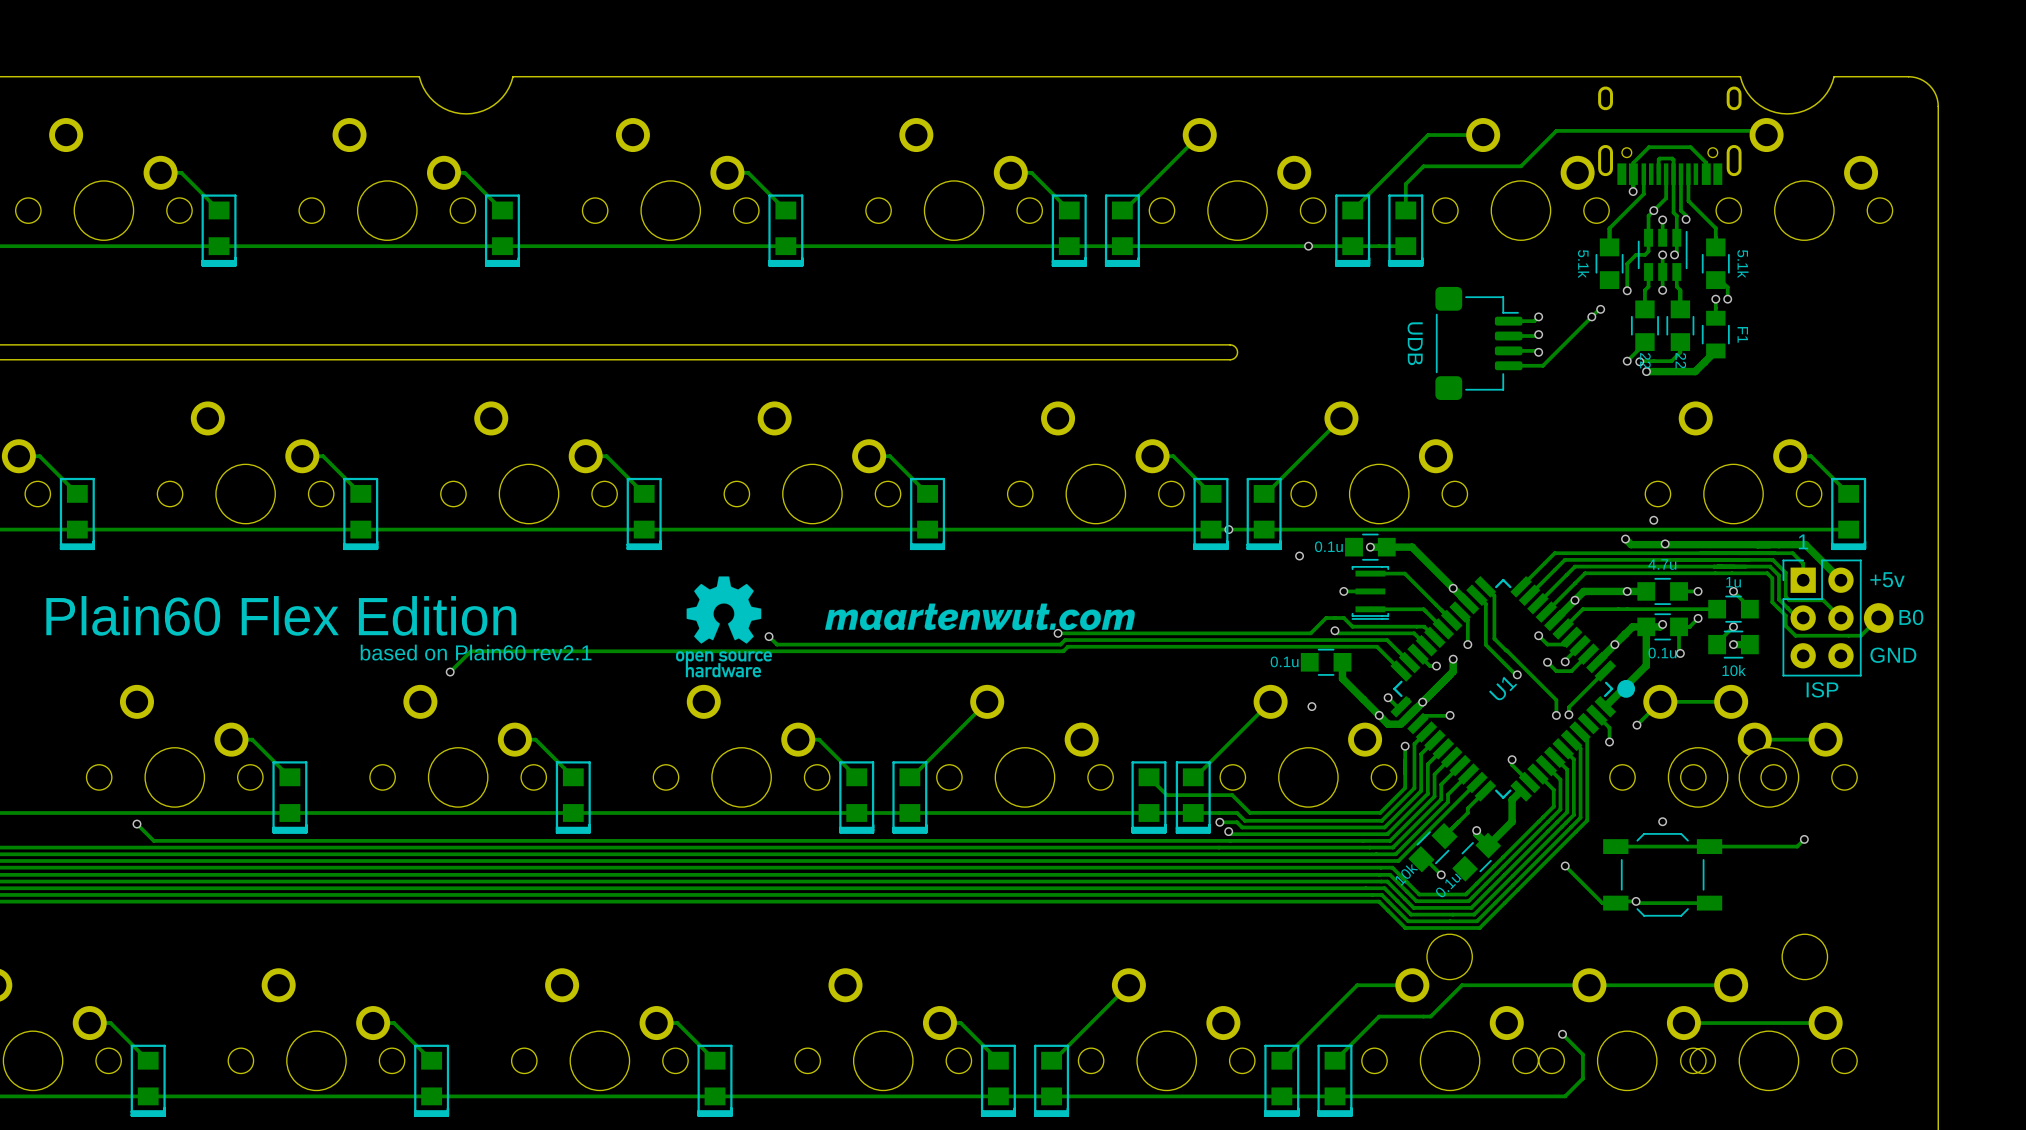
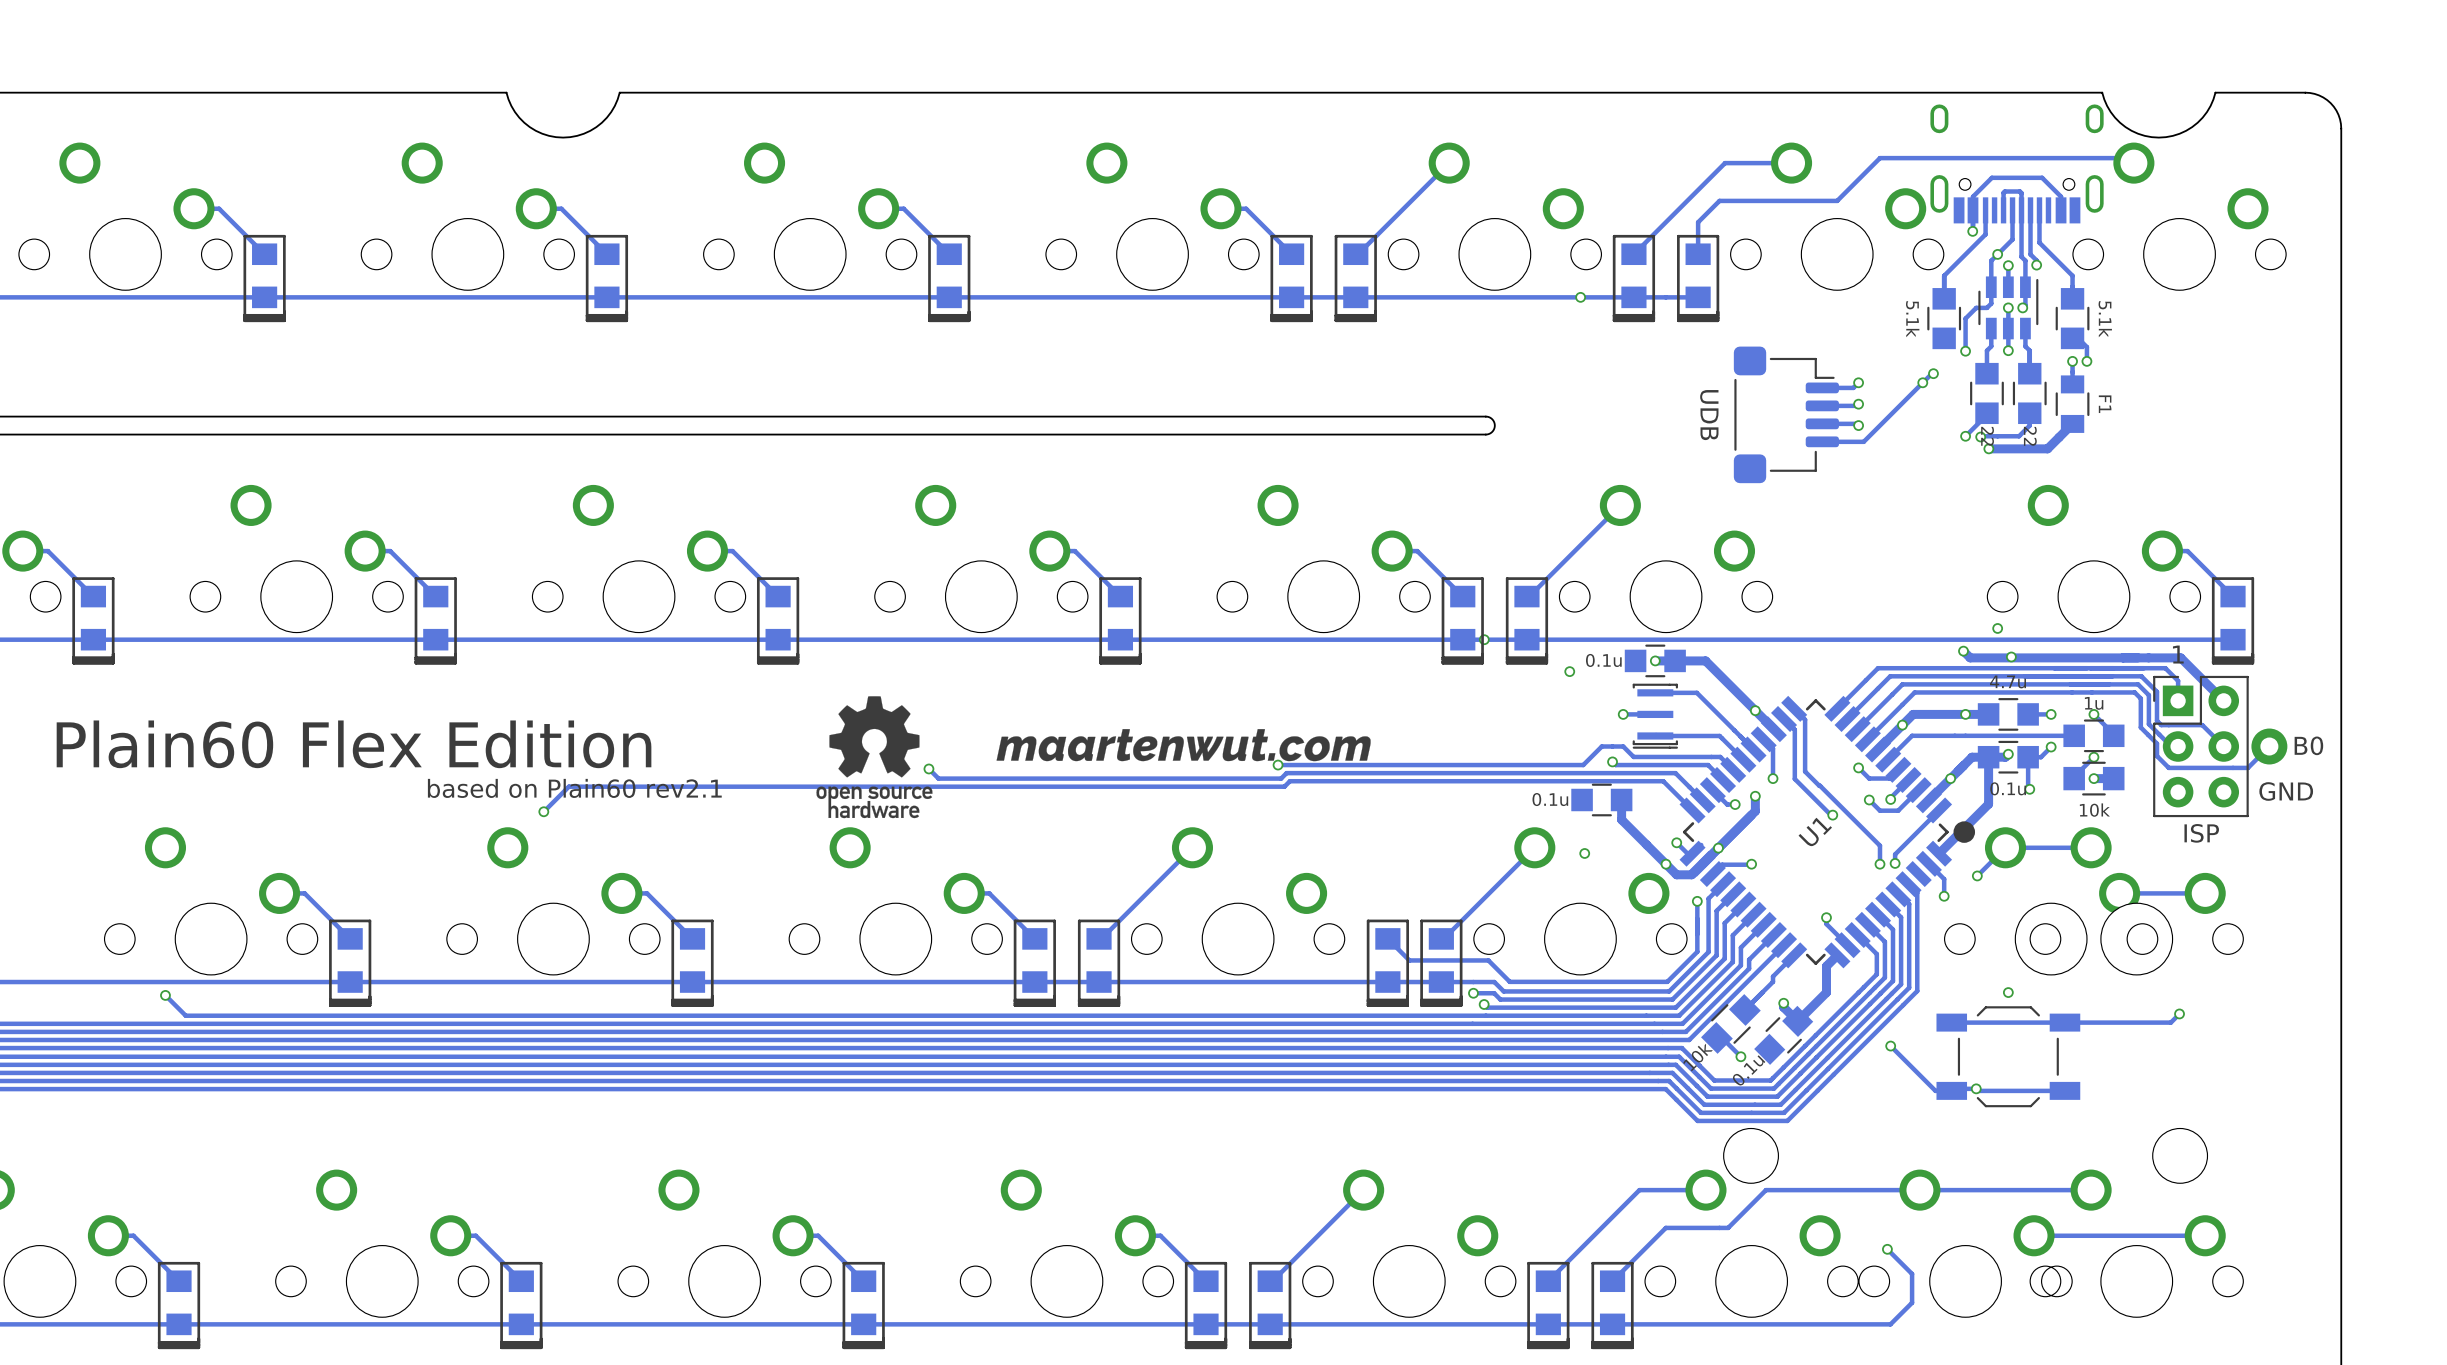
text: +5v (1887, 579) -> none

